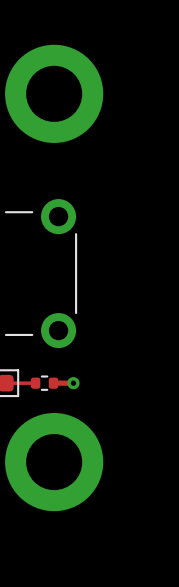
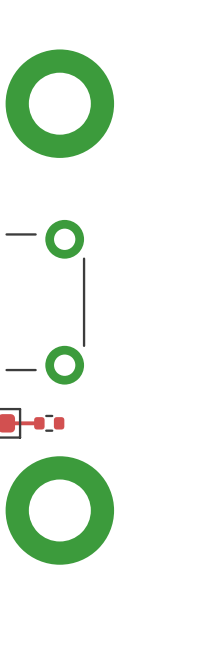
top track: (53, 383) (73, 383) -> none
via: (73, 383) -> none

